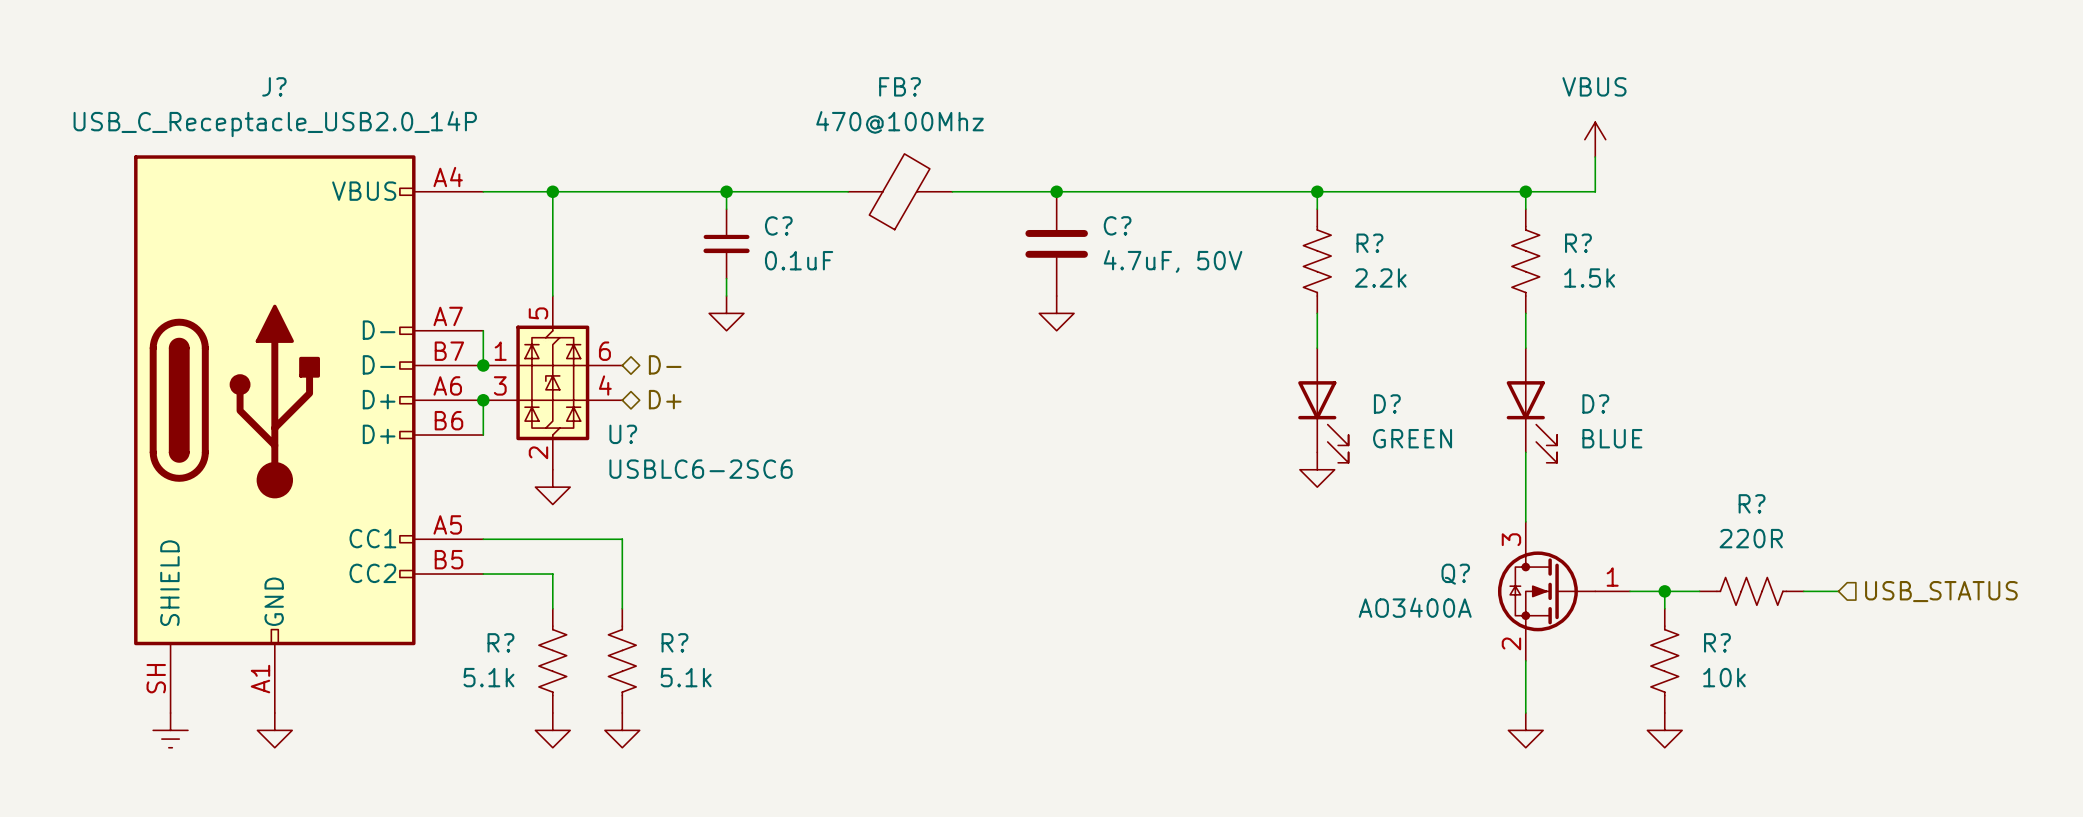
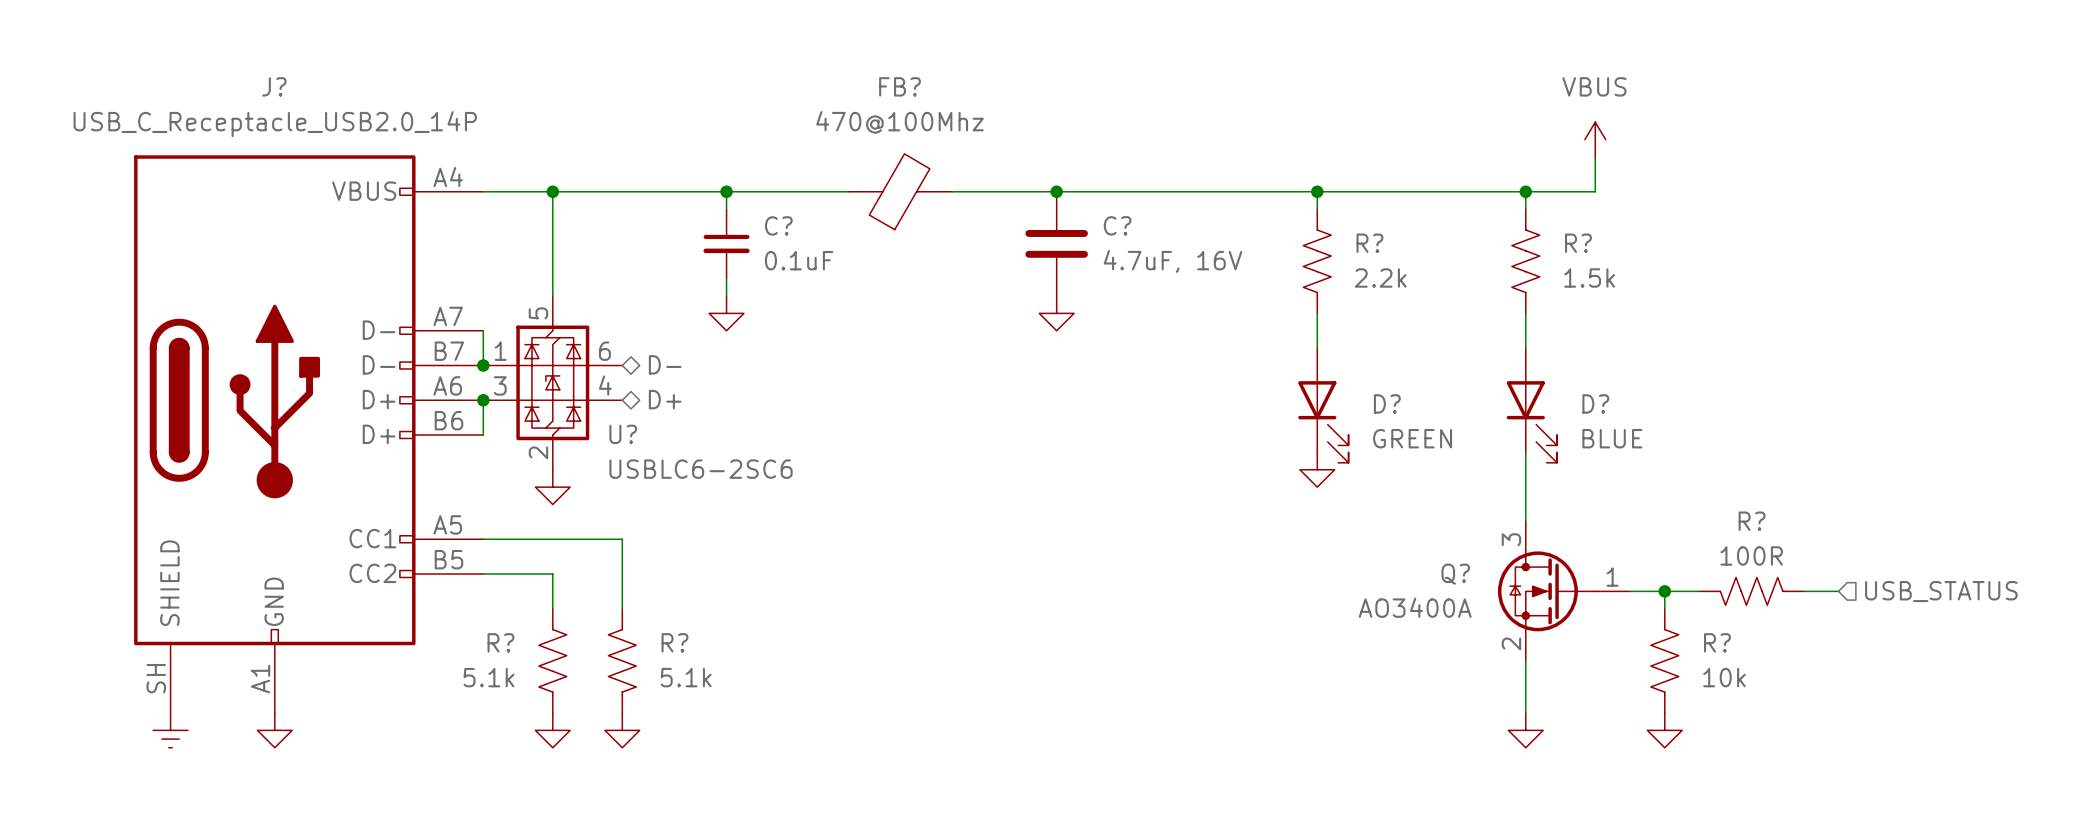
C? value: 4.7uF, 50V (1173, 261) -> 4.7uF, 16V (1173, 261)
R? value: 220R (1751, 538) -> 100R (1751, 555)
R? flip: as is (1751, 591) -> left-right (1751, 591)

